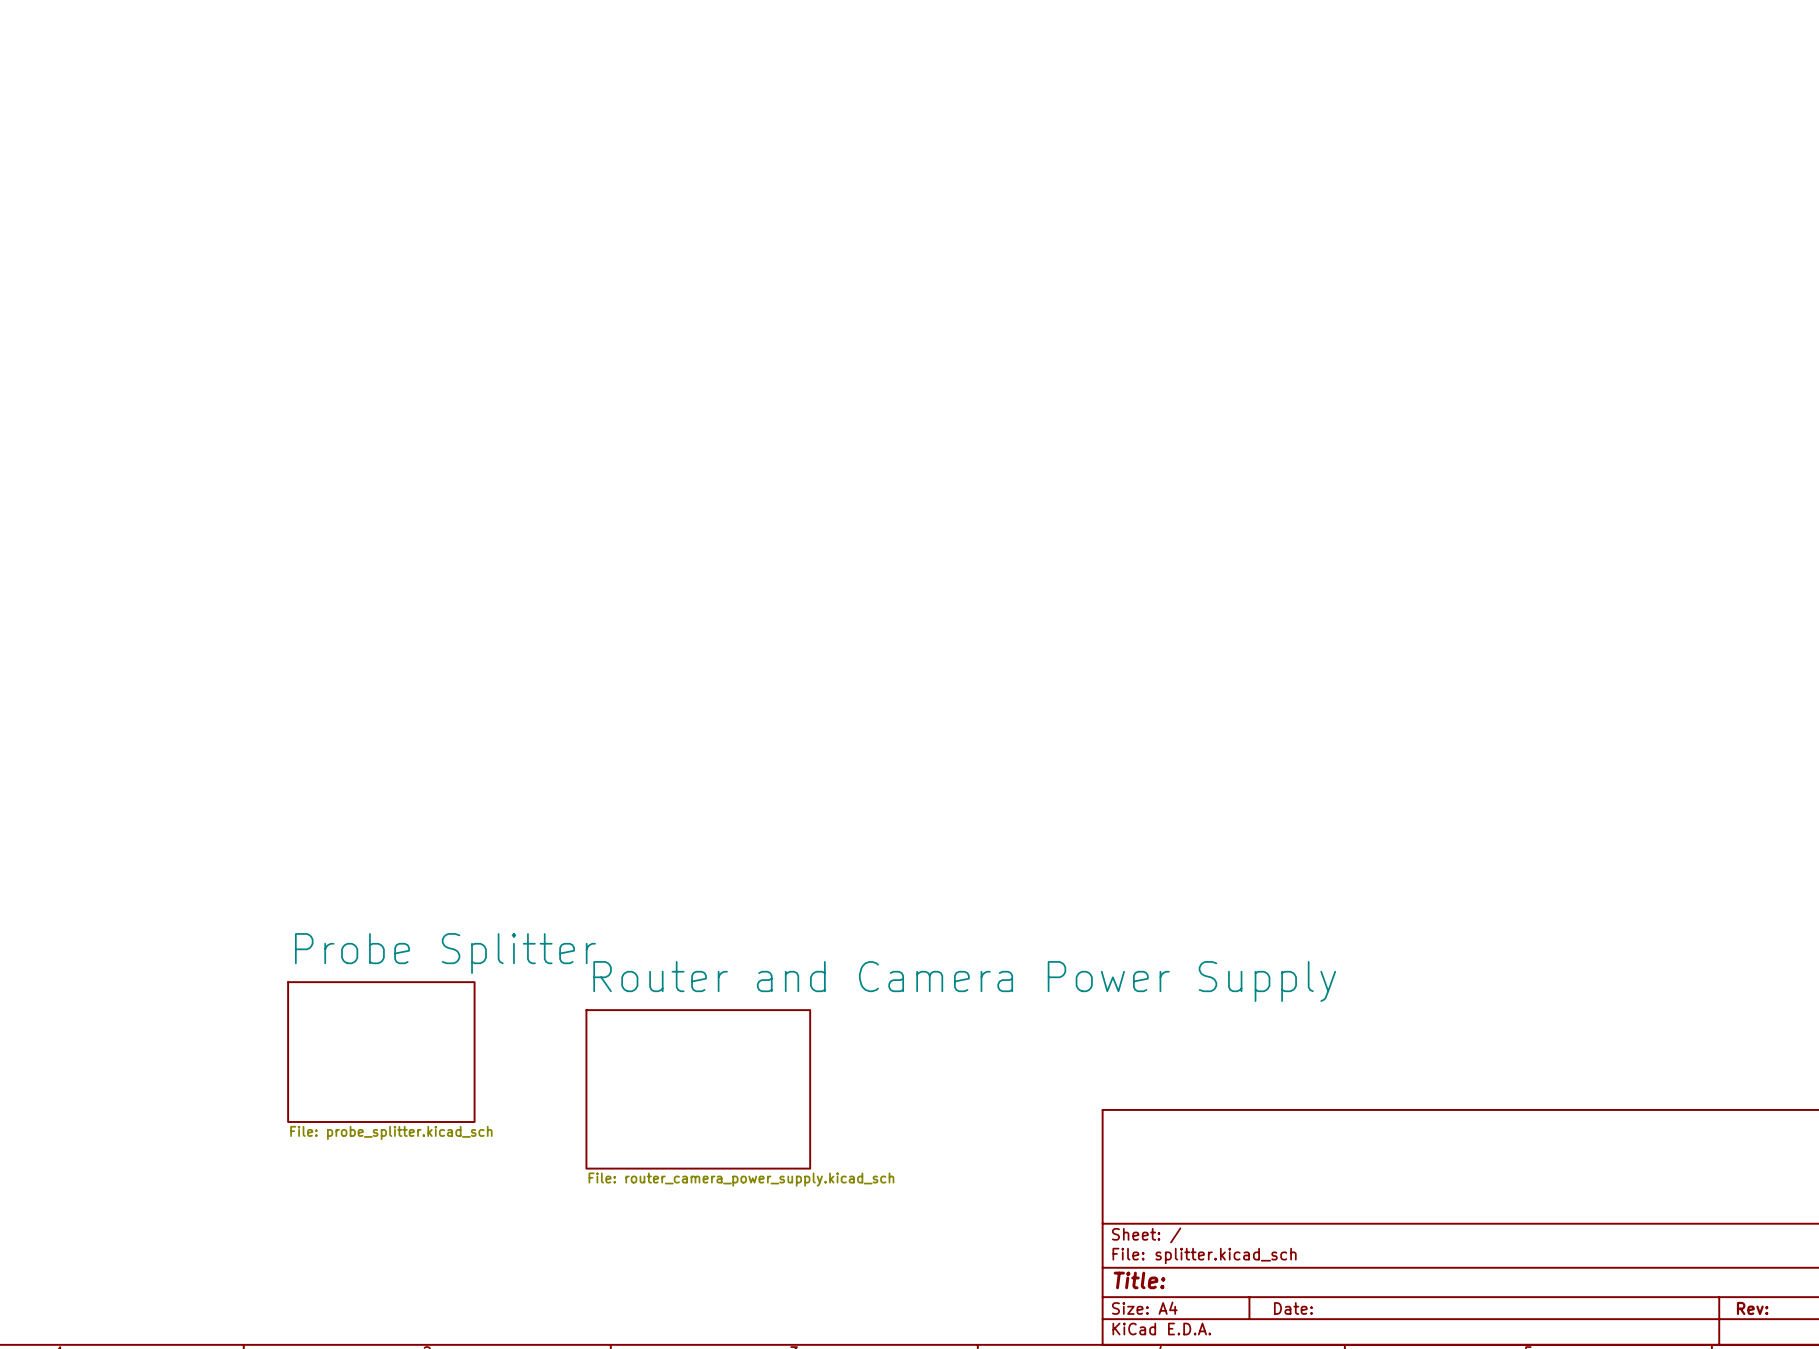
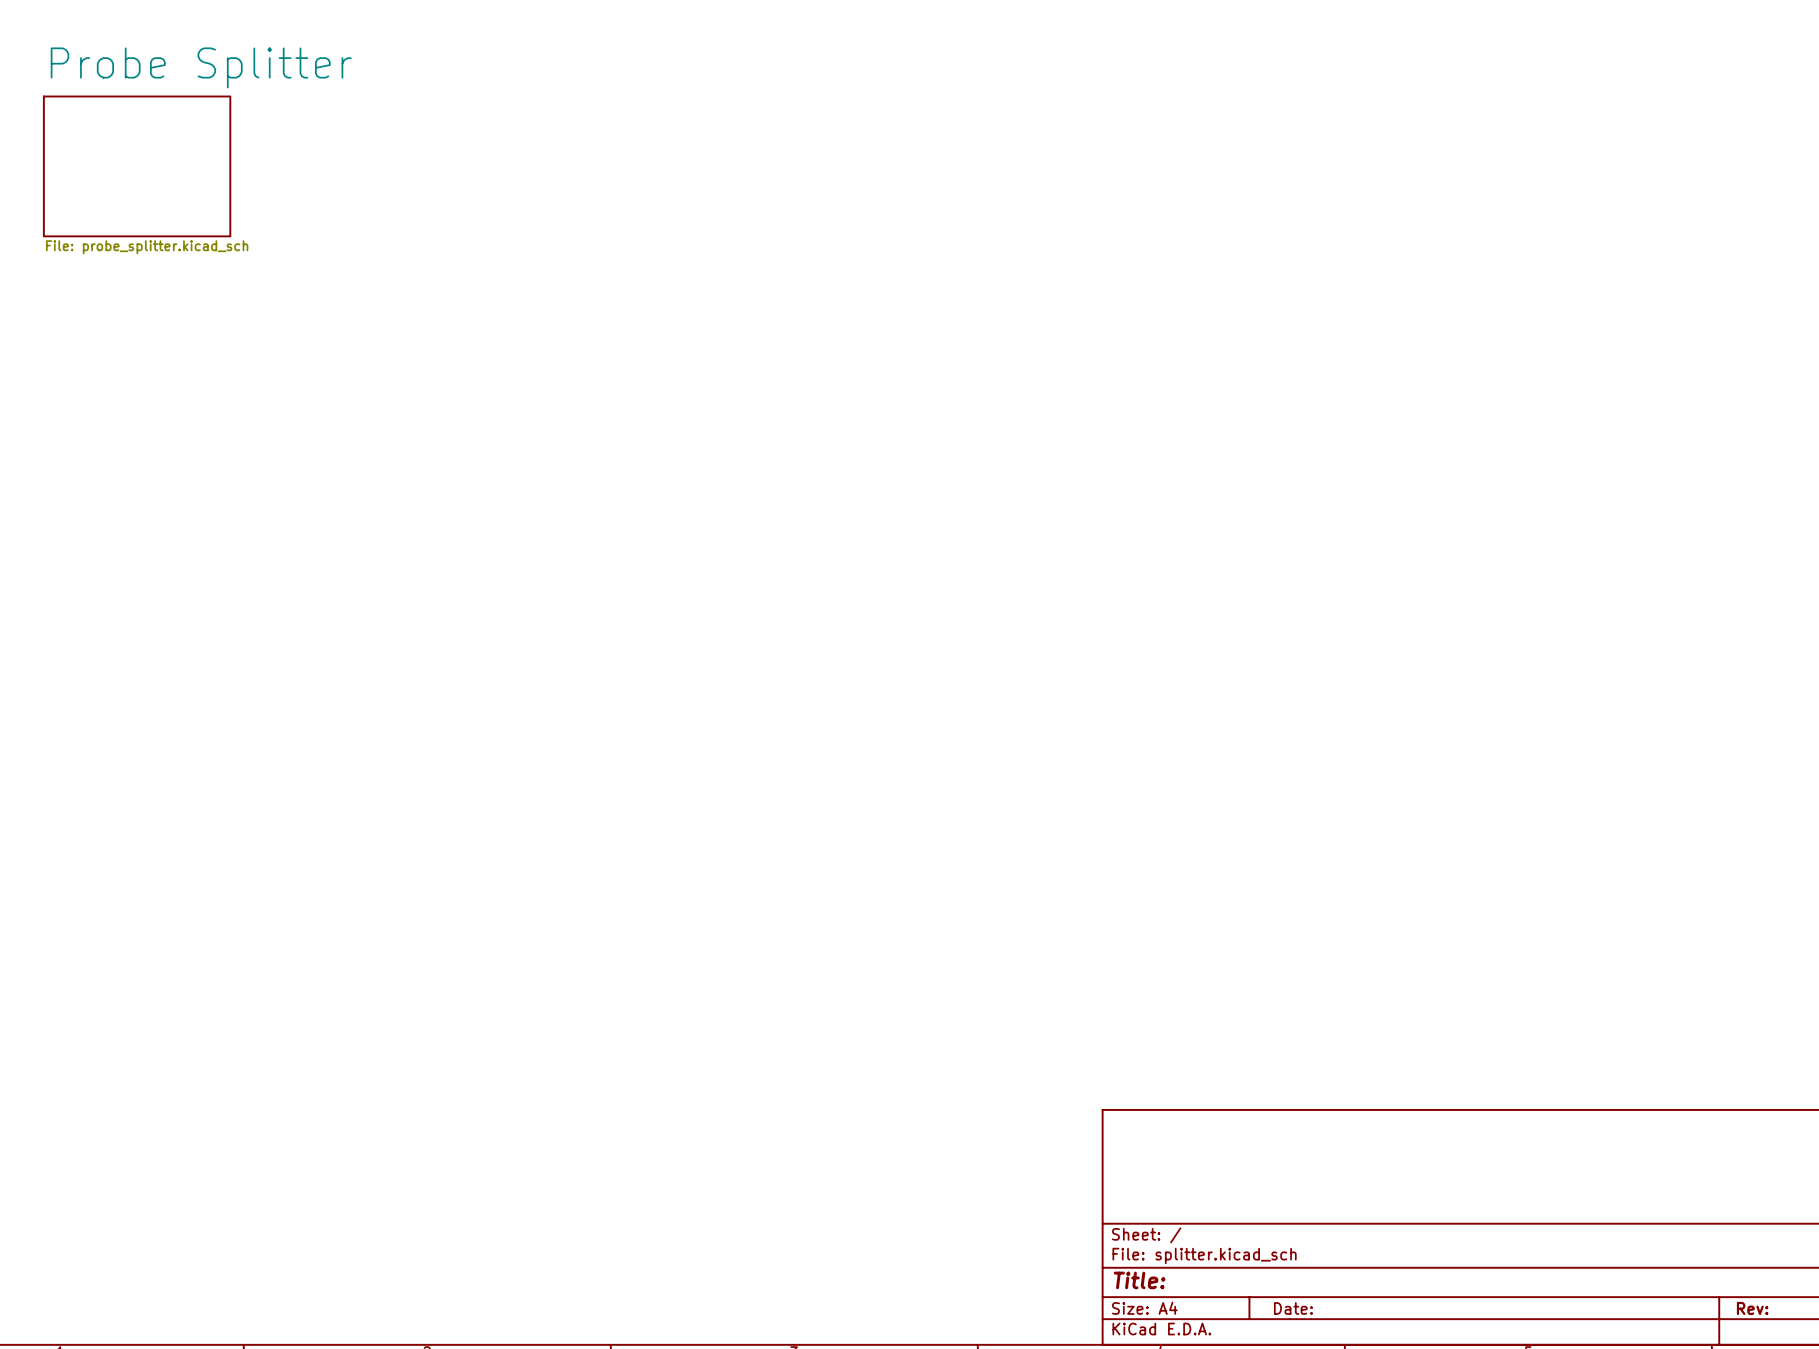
sheet Probe Splitter: none -> File: probe_splitter.kicad_sch (137, 166)
sheet Probe Splitter: File: probe_splitter.kicad_sch (381, 1052) -> none
sheet Router and Camera Power Supply: File: router_camera_power_supply.kicad_sch (698, 1089) -> none

